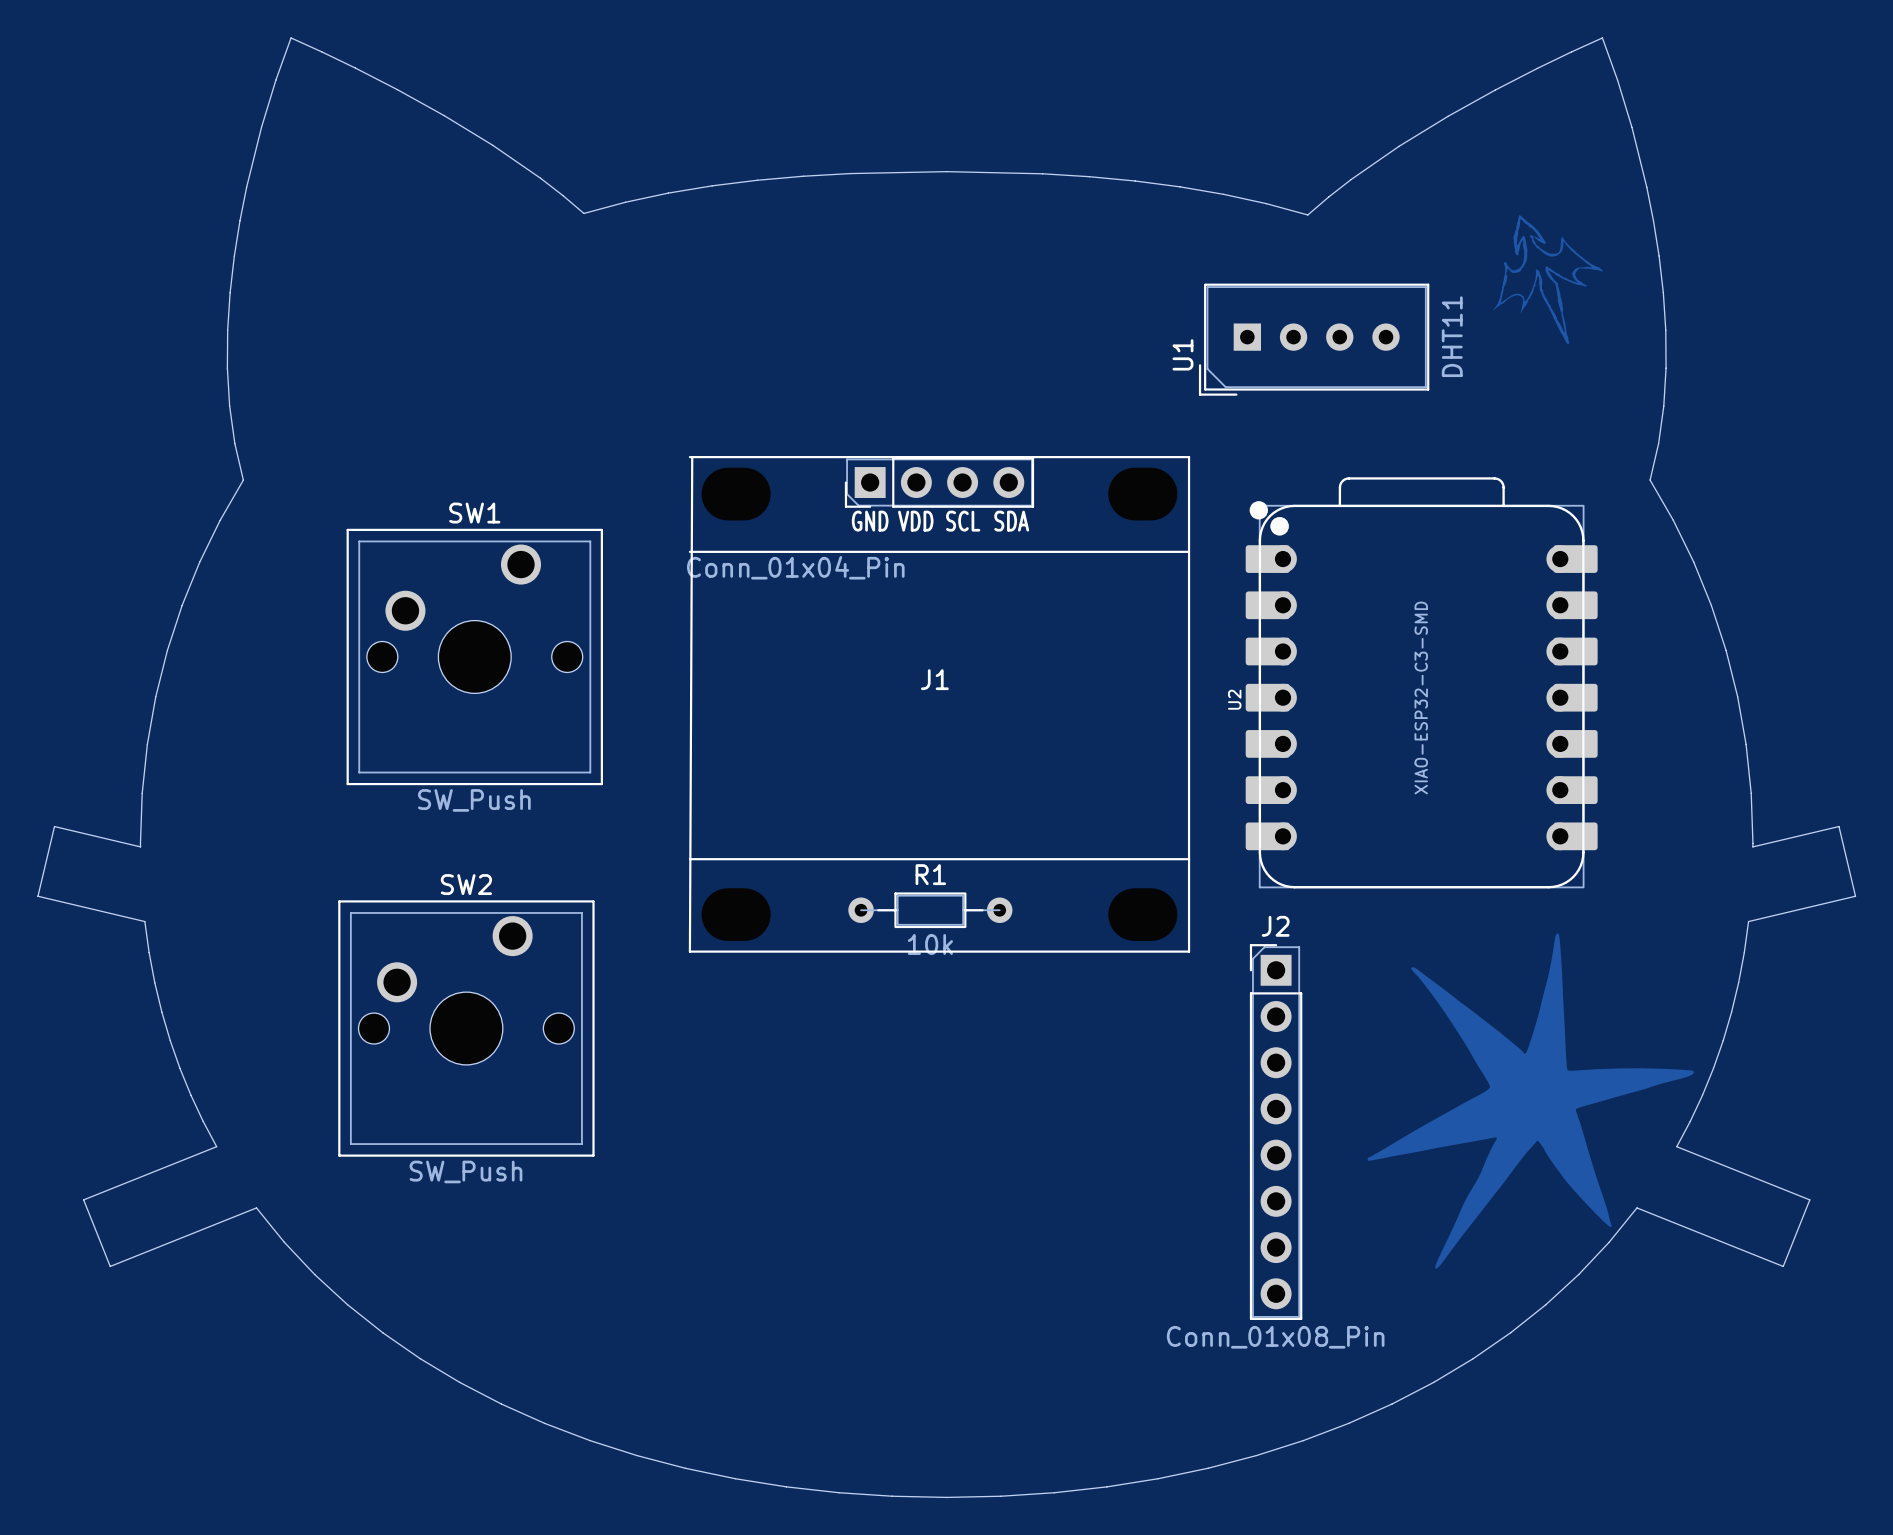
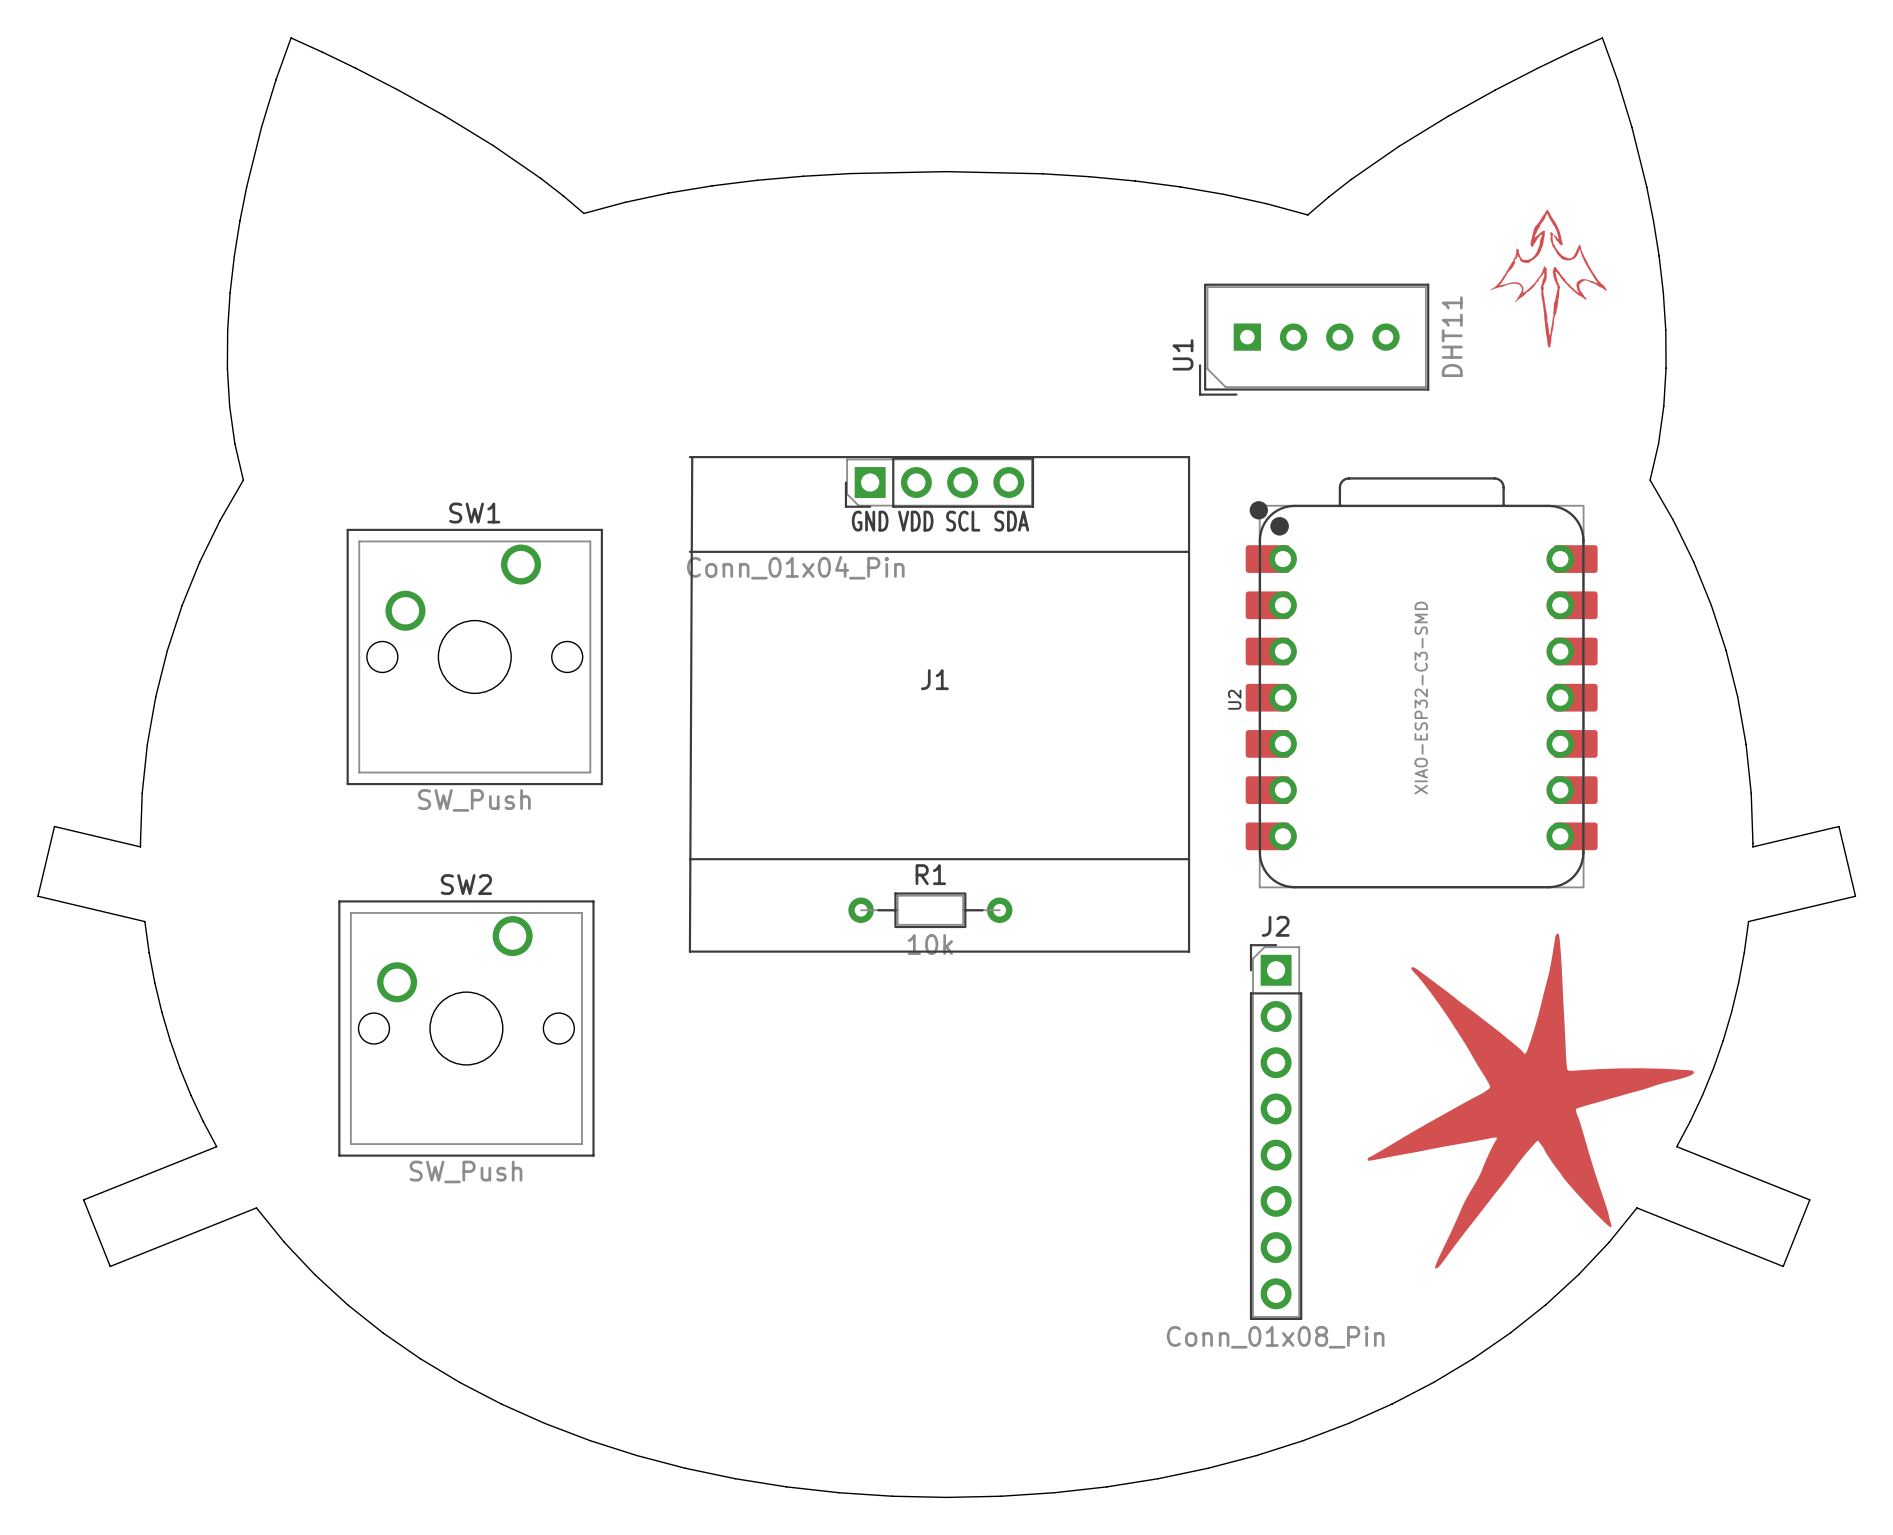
drawing shape: [1493, 214, 1603, 346] -> [1490, 209, 1607, 349]

